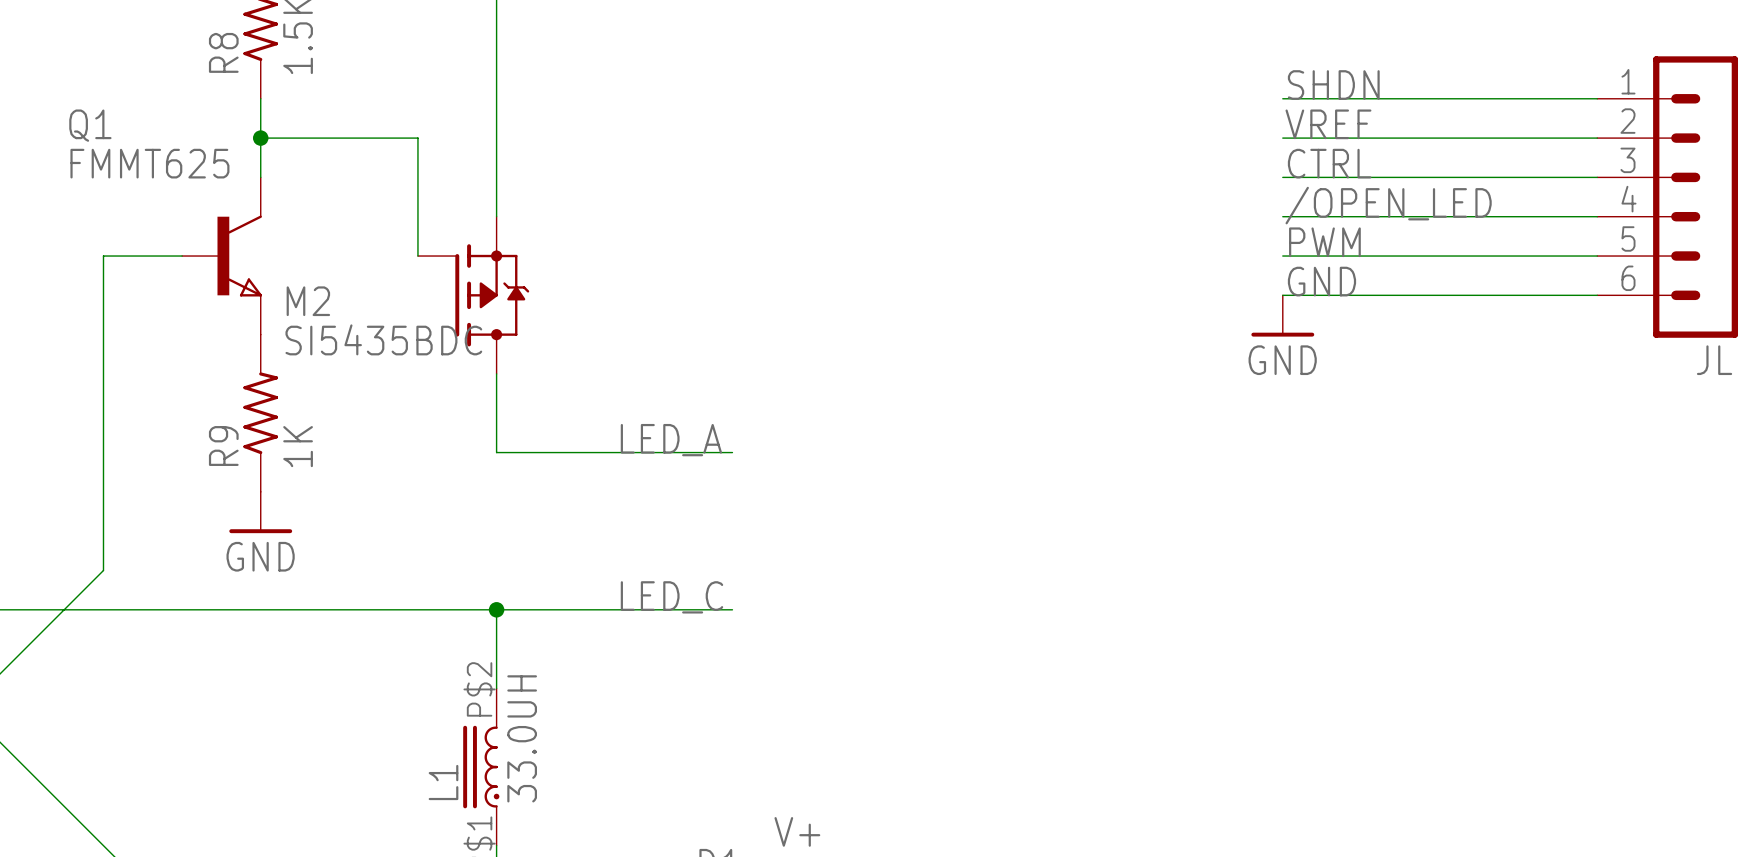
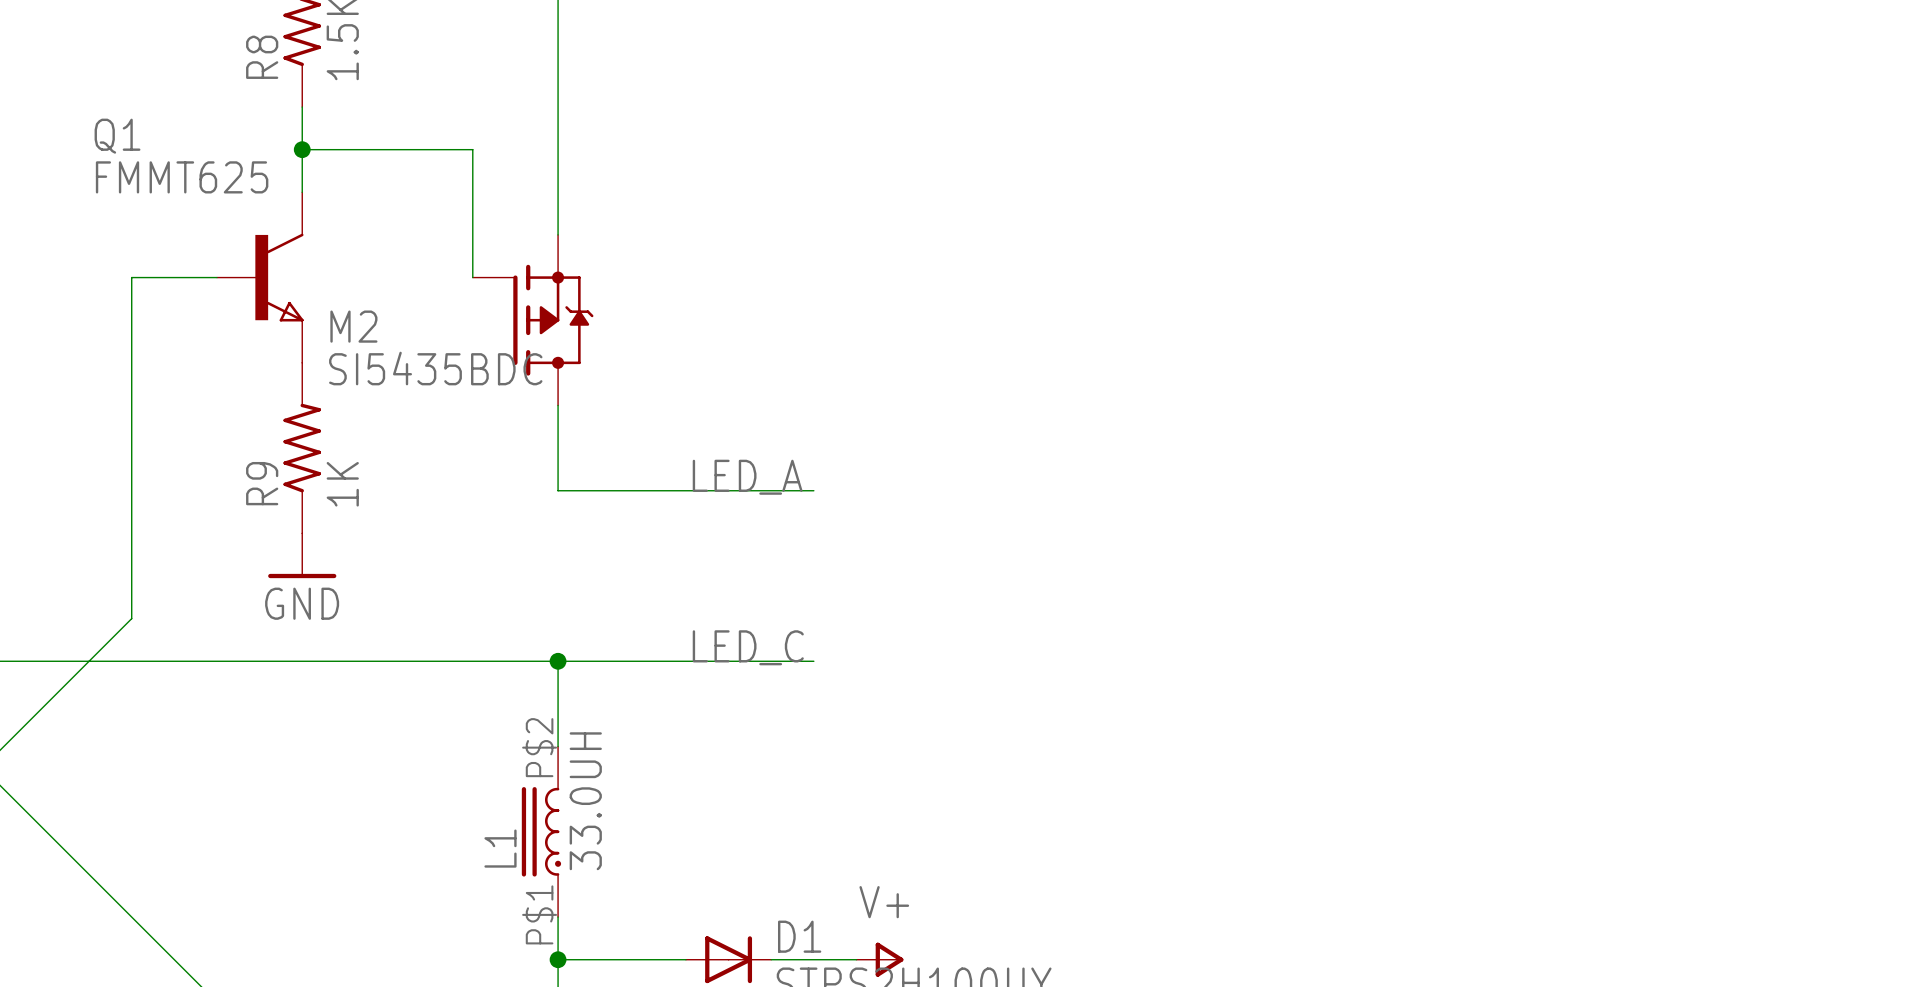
label: SHDN (1333, 85) -> none
wire: (1282, 98) (1597, 98) -> none
label: VREF (1328, 124) -> none
wire: (1282, 138) (1597, 138) -> none
label: CTRL (1329, 163) -> none
wire: (1282, 177) (1597, 177) -> none
JL: (1667, 197) -> none
label: /OPEN_LED (1388, 205) -> none
wire: (1282, 216) (1597, 216) -> none
label: PWM (1324, 242) -> none
wire: (1282, 256) (1597, 256) -> none
label: GND (1321, 281) -> none
wire: (1282, 295) (1597, 295) -> none
power symbol: GND (1282, 315) -> none

